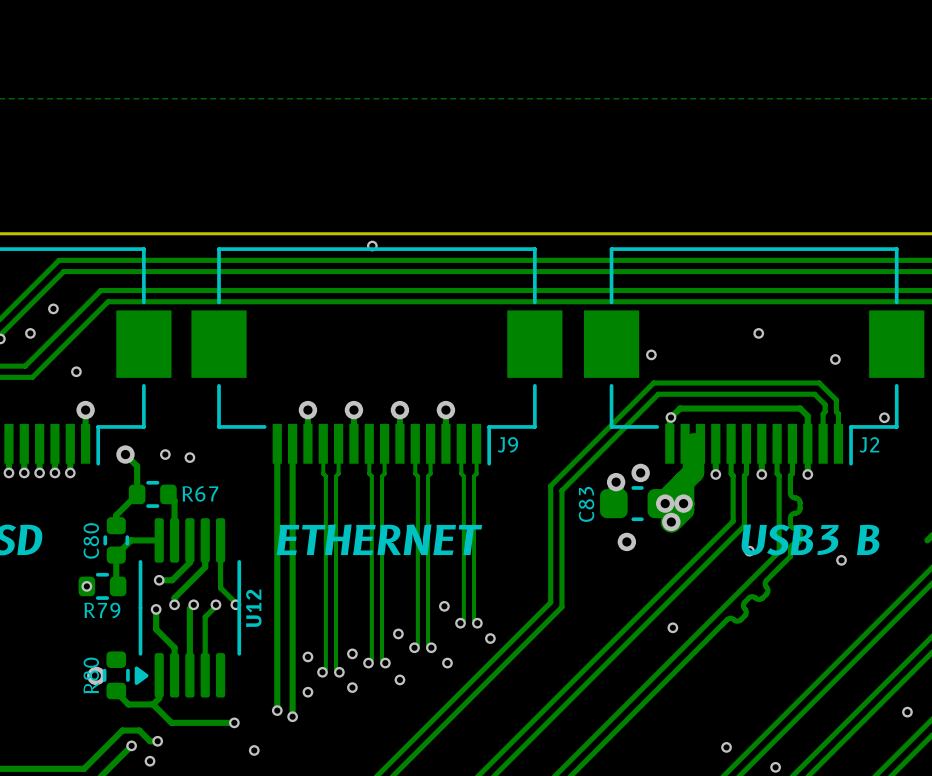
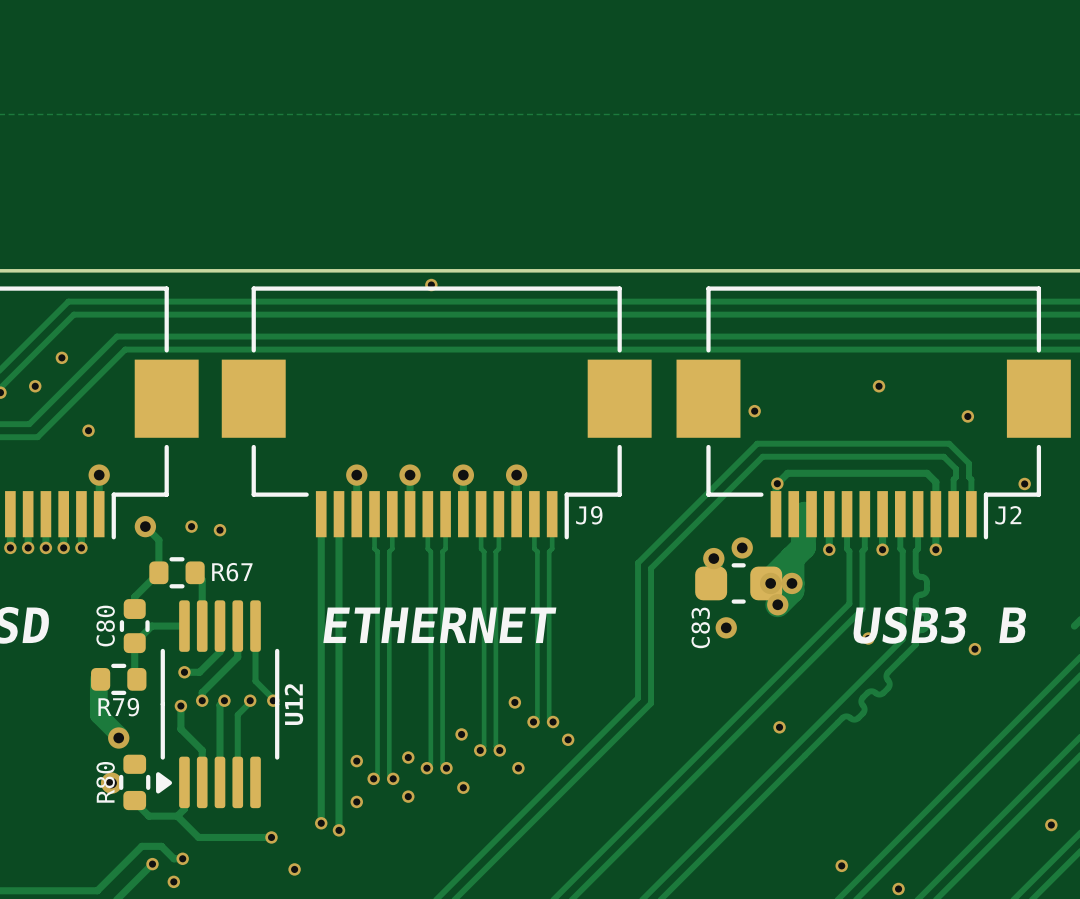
C83 name position: C83 (586, 504) -> C83 (700, 627)
track: none -> (98, 679) (98, 714) (118, 734) (118, 737)
via: (86, 586) -> none
via: none -> (118, 737)

